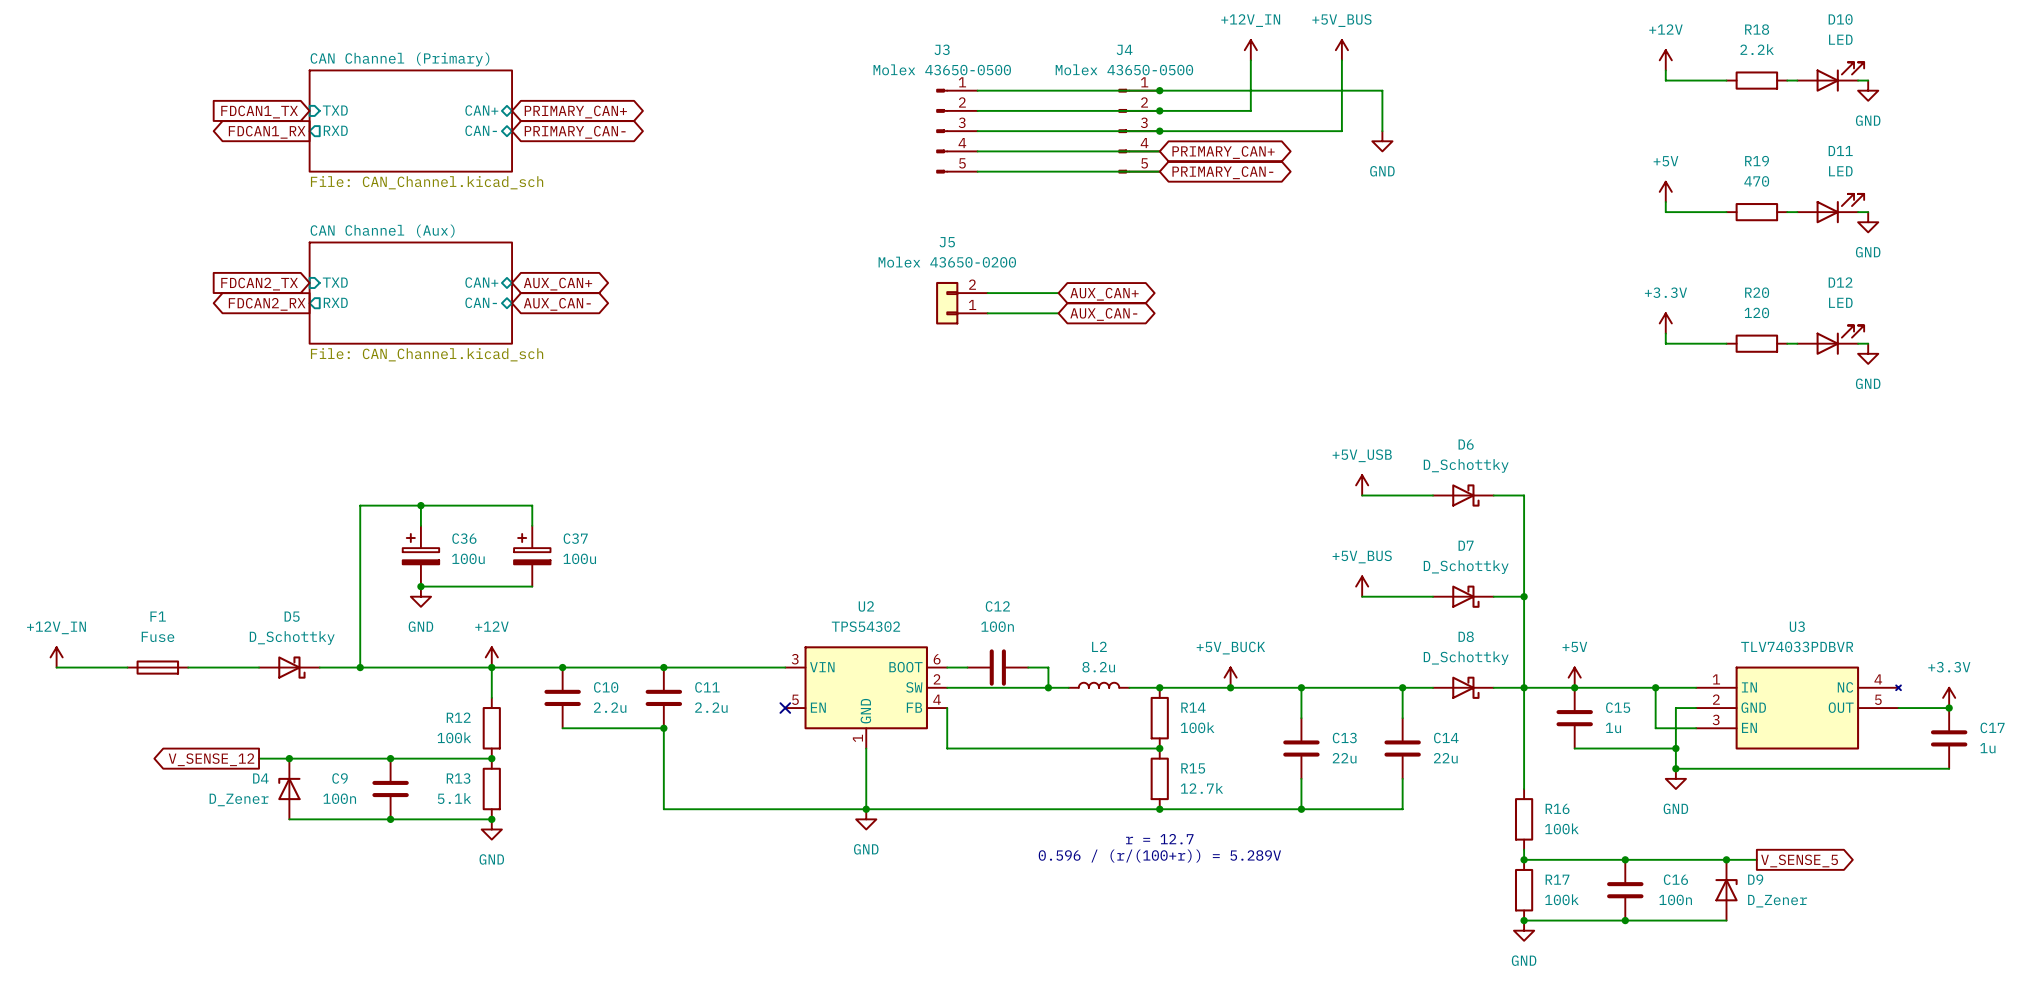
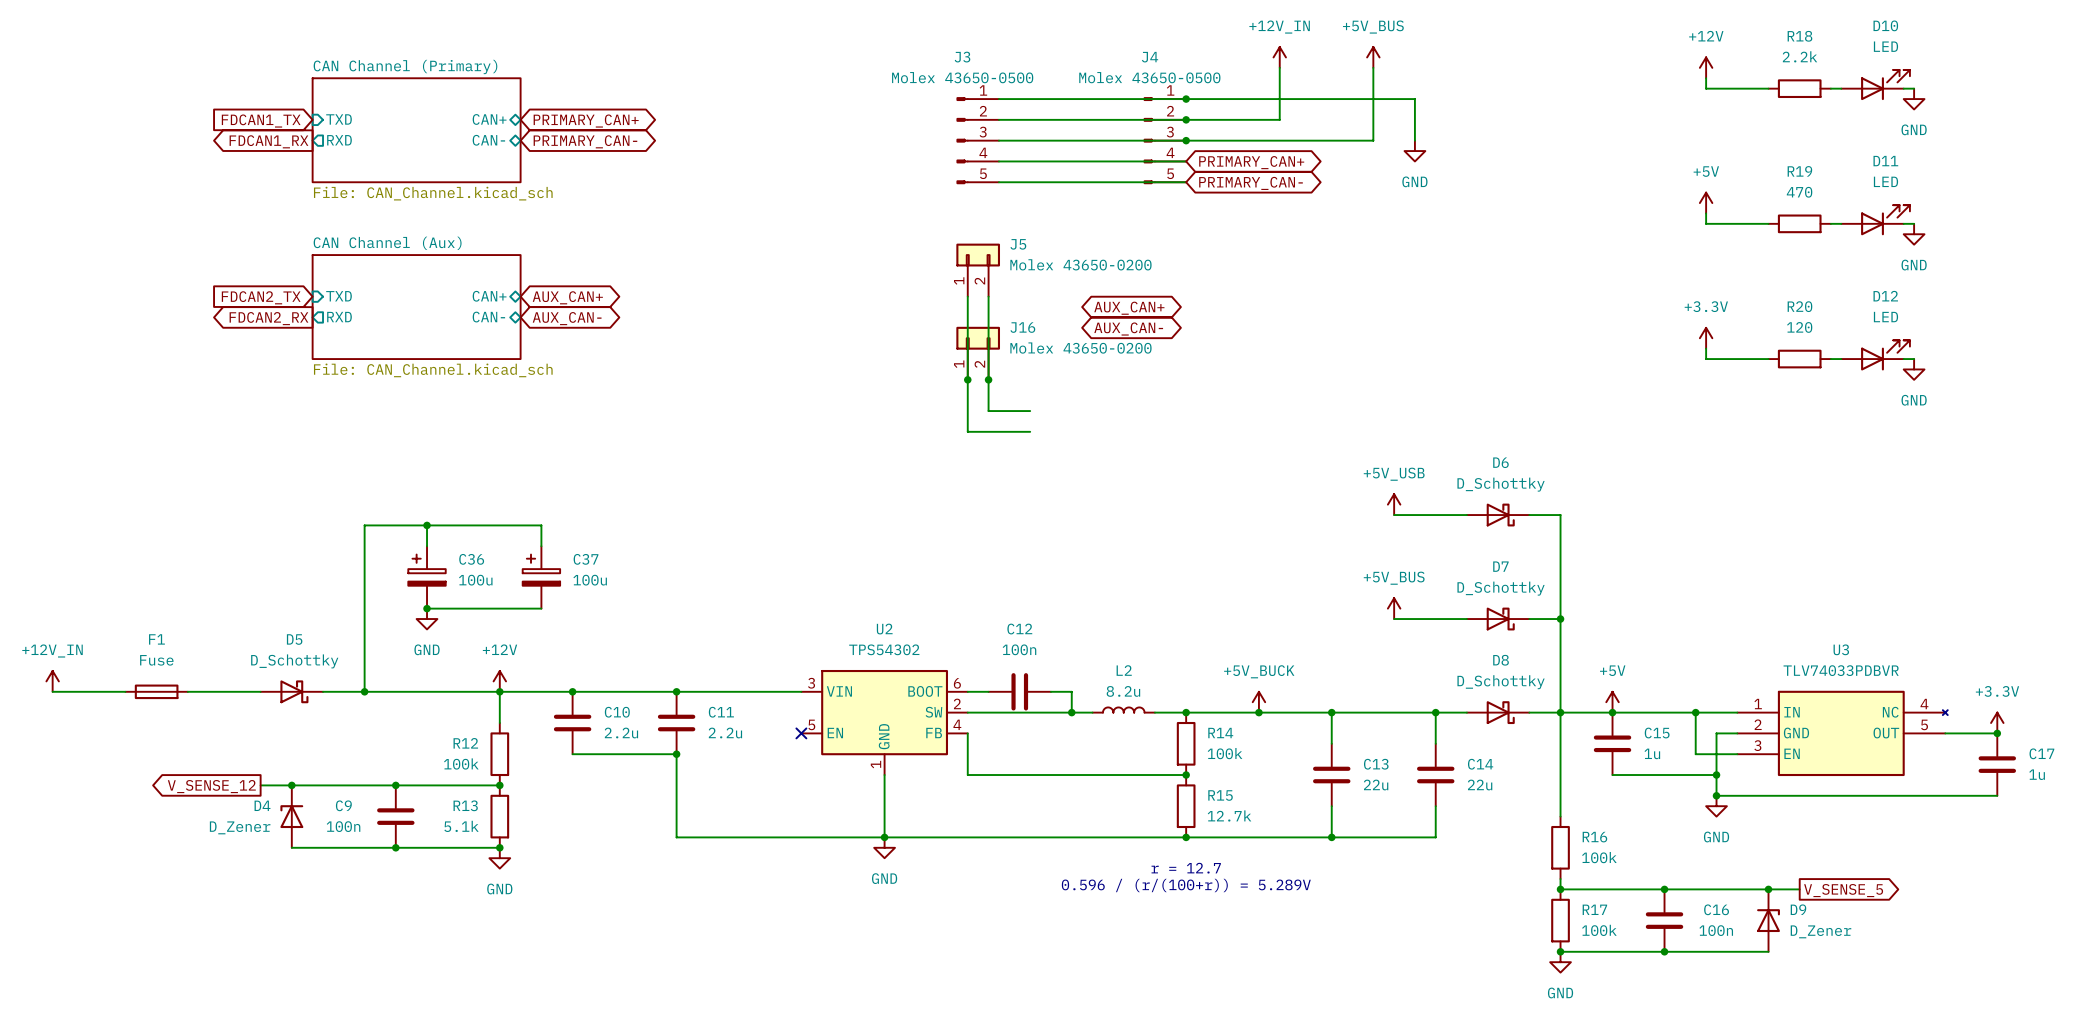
J5 name position: J5 (947, 242) -> J5 (1018, 244)
J5 value position: Molex 43650-0200 (947, 262) -> Molex 43650-0200 (1080, 264)
wire: none -> (967, 296) (967, 431) (1030, 431)
wire: none -> (988, 296) (988, 411) (1030, 411)
wire: (987, 293) (1058, 293) -> none
J5 rotation: 0° (947, 303) -> 90° clockwise (978, 255)
J5 position: (961, 303) -> (978, 270)
wire: (987, 313) (1058, 313) -> none
J16: none -> Molex 43650-0200 (978, 353)
junction: none -> (967, 379)
junction: none -> (988, 379)

